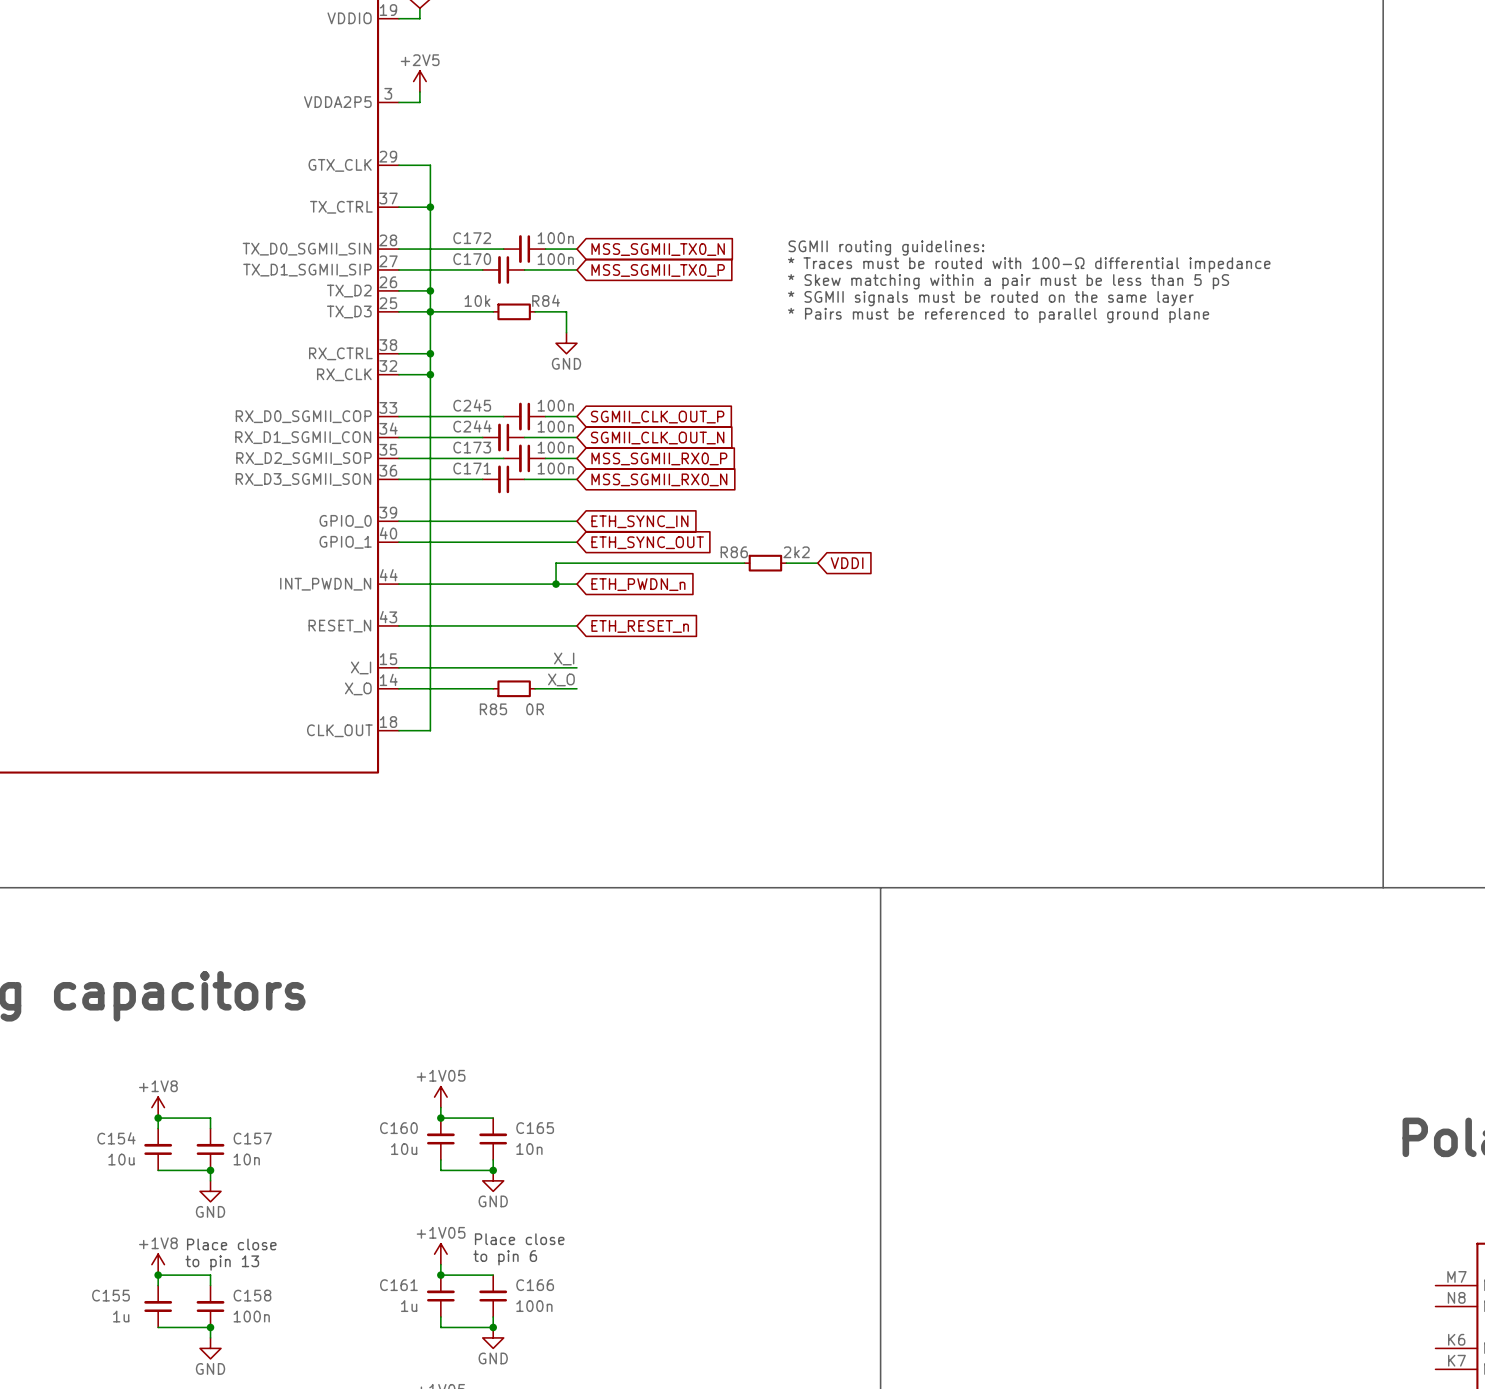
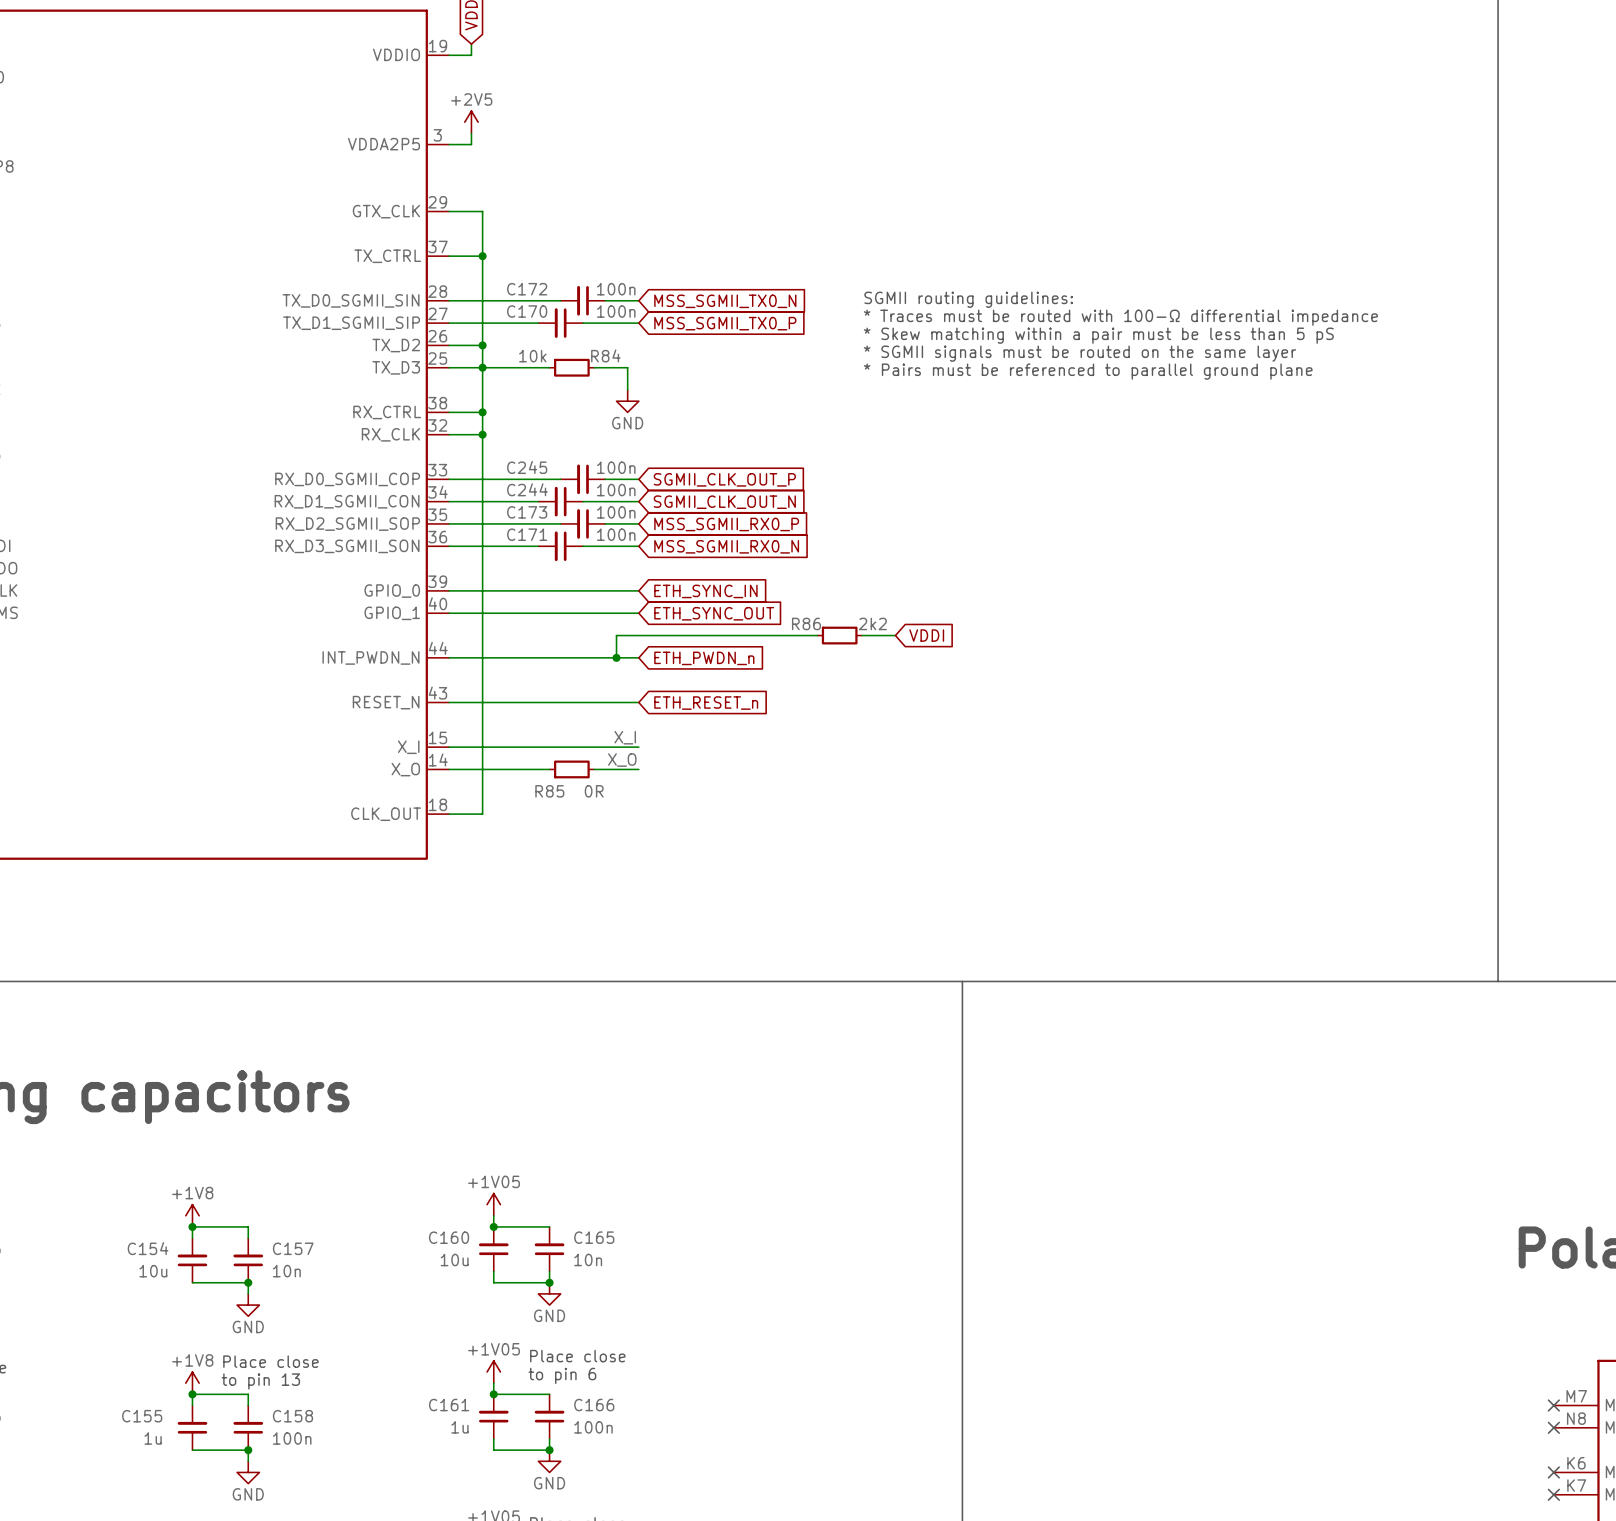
no-connect mark: none -> (1553, 1405)
no-connect mark: none -> (1553, 1427)
no-connect mark: none -> (1553, 1472)
no-connect mark: none -> (1553, 1494)

